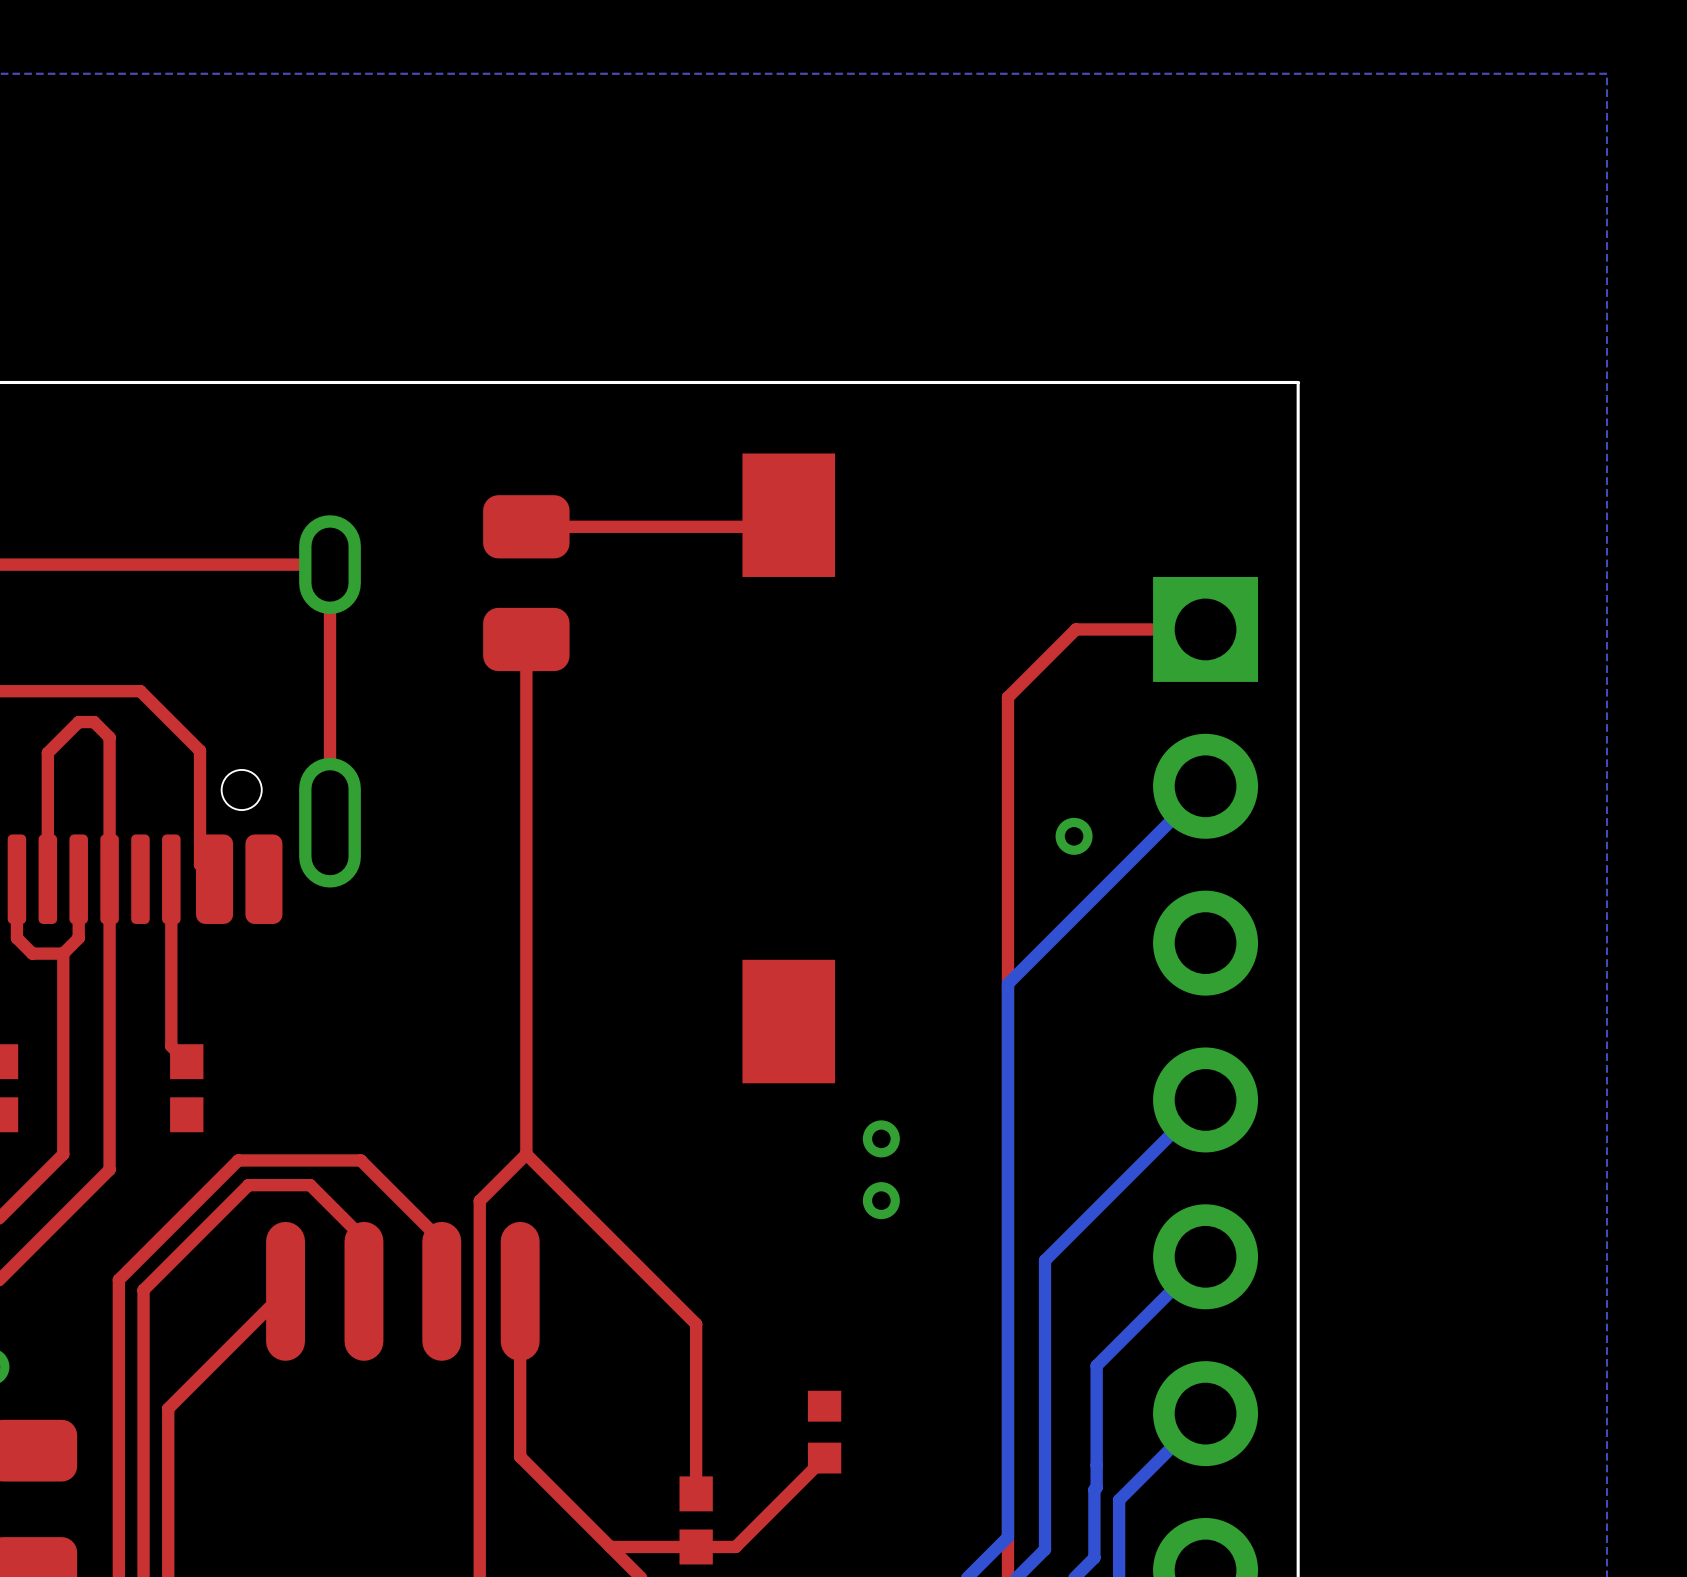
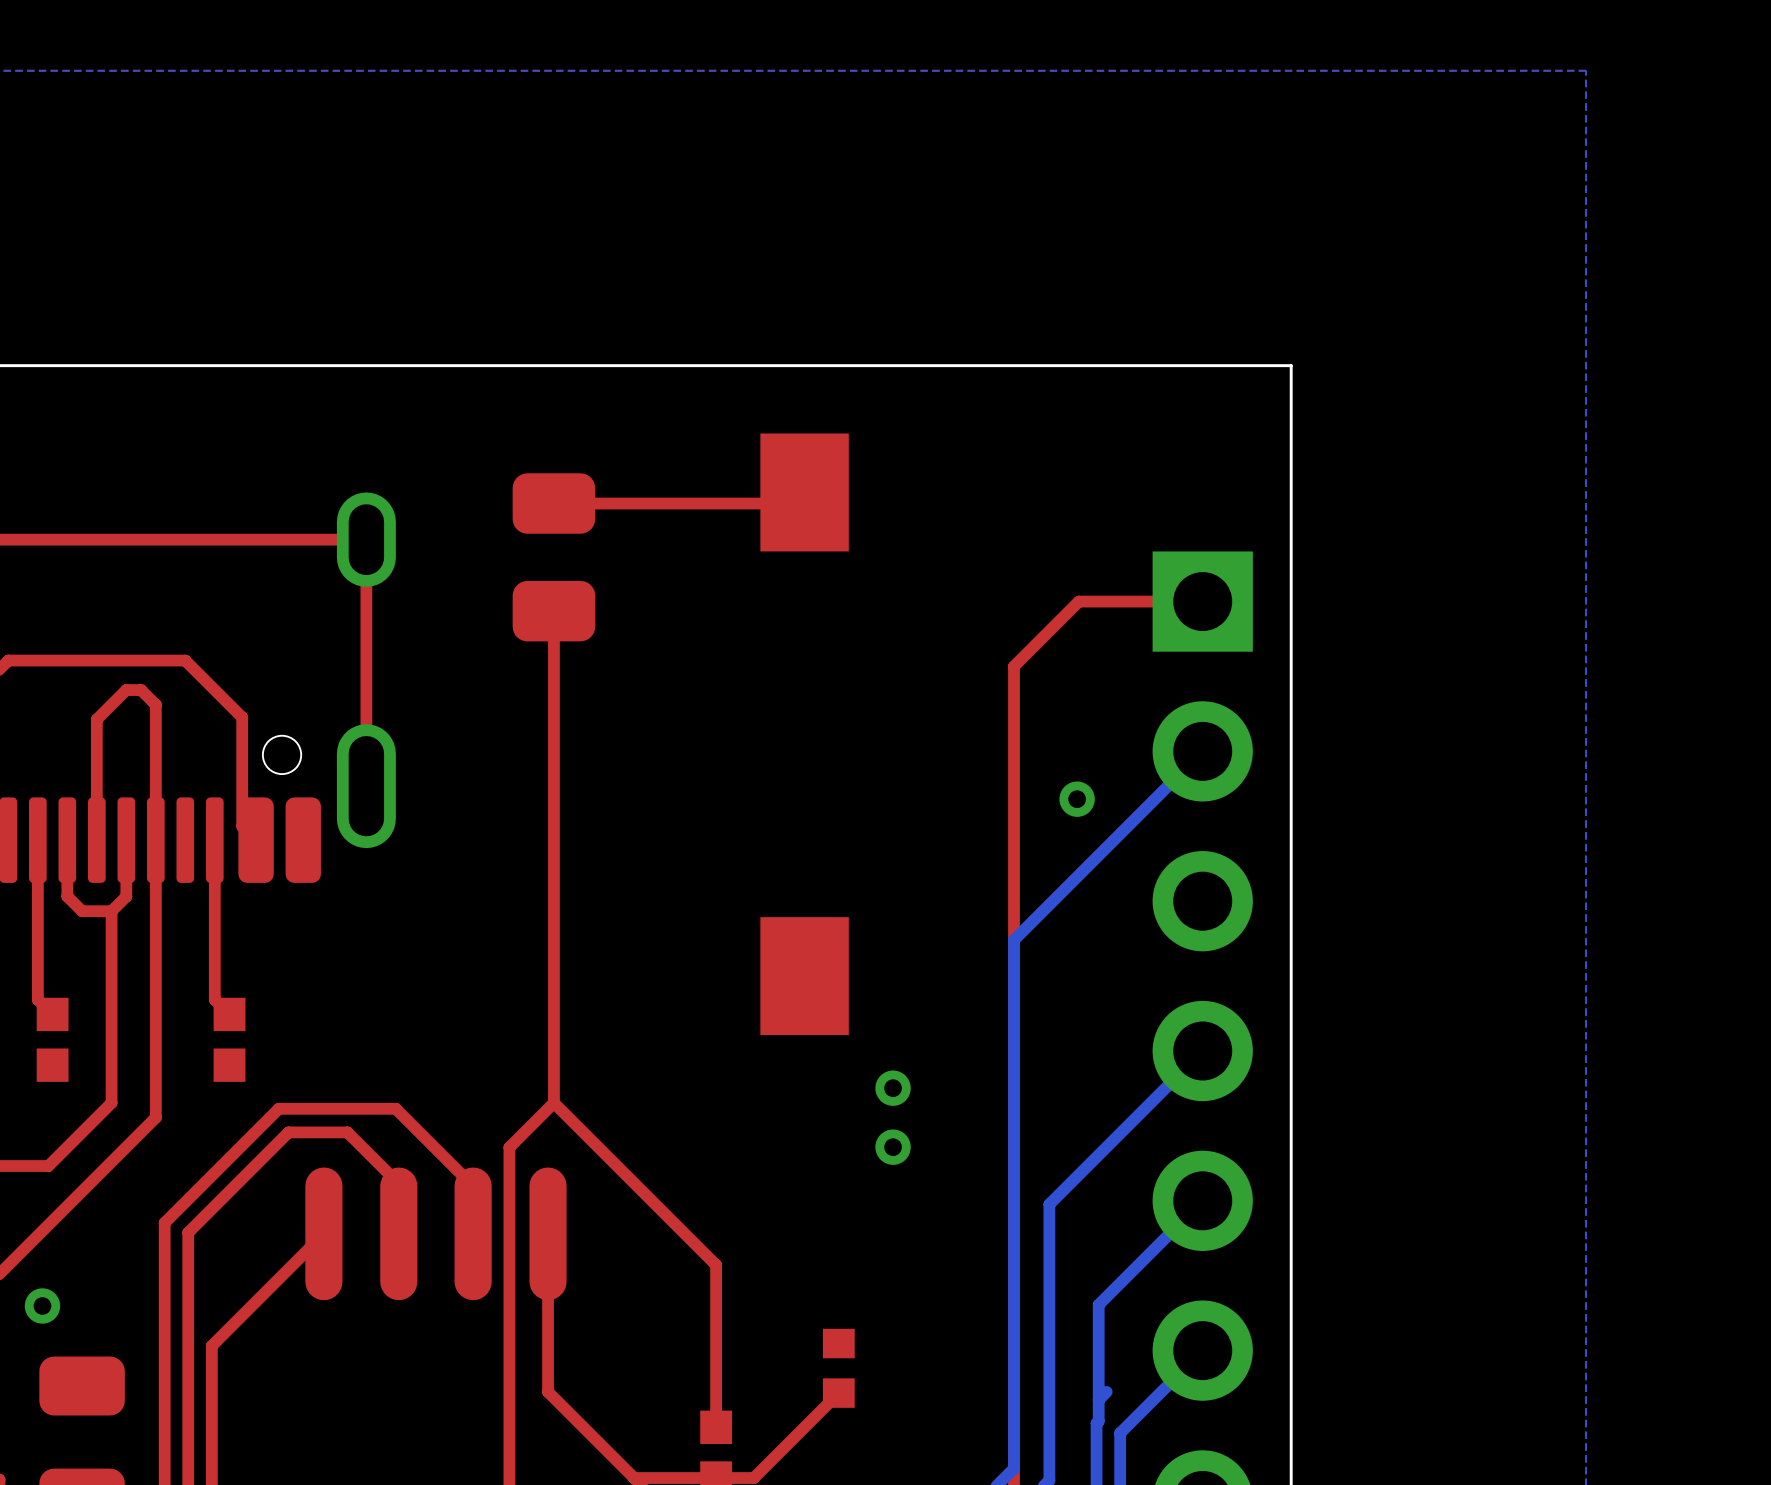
bottom track: none -> (1106, 1391) (1098, 1399)

